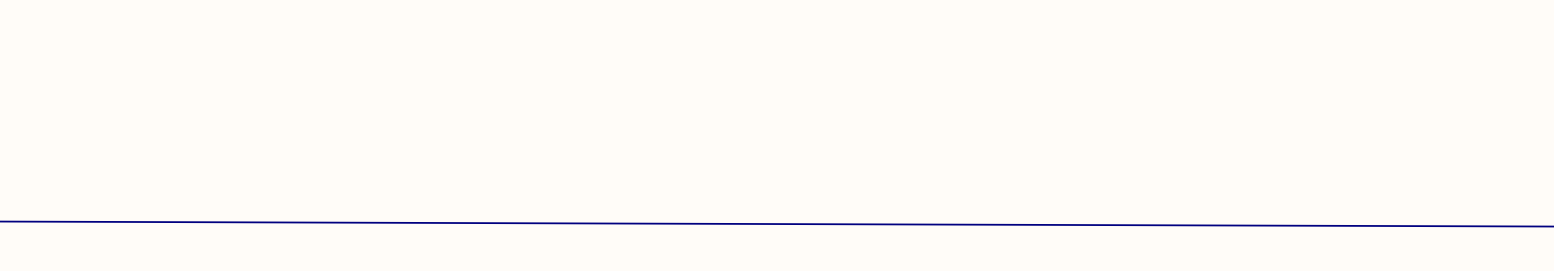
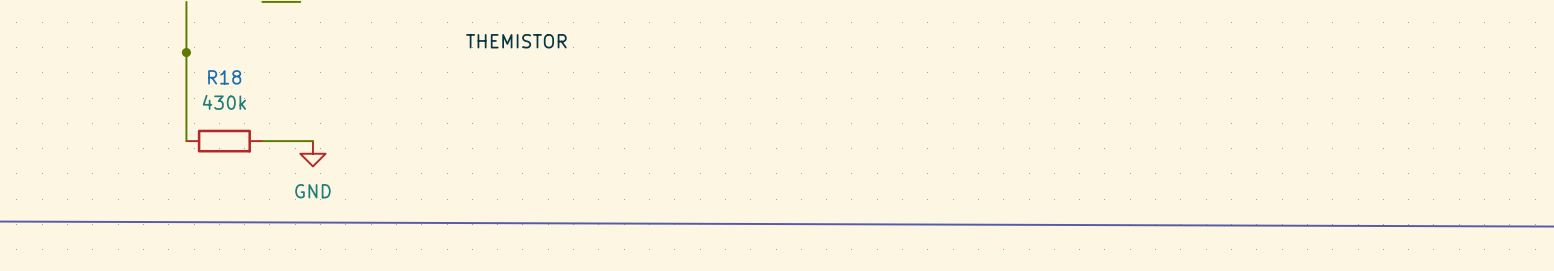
wire: none -> (186, 1) (186, 141)
wire: none -> (262, 1) (300, 1)
label: none -> THEMISTOR (516, 41)
junction: none -> (186, 52)
R18: none -> 430k (224, 141)
wire: none -> (262, 141) (312, 141)
power symbol: none -> GND (312, 153)

